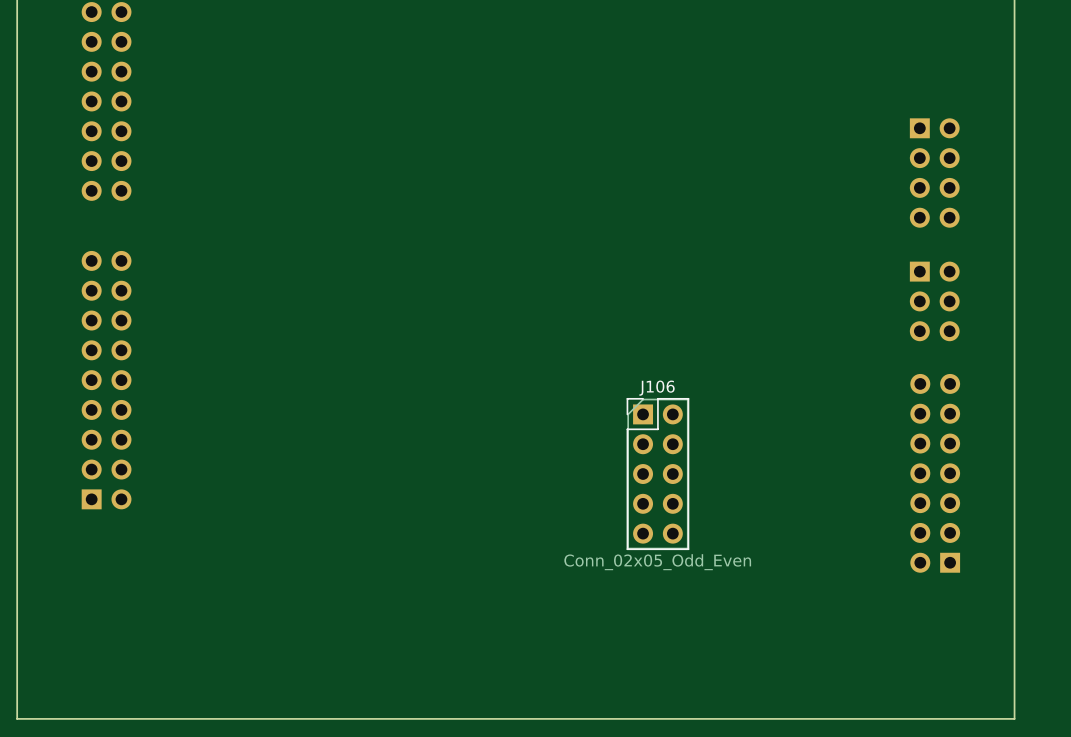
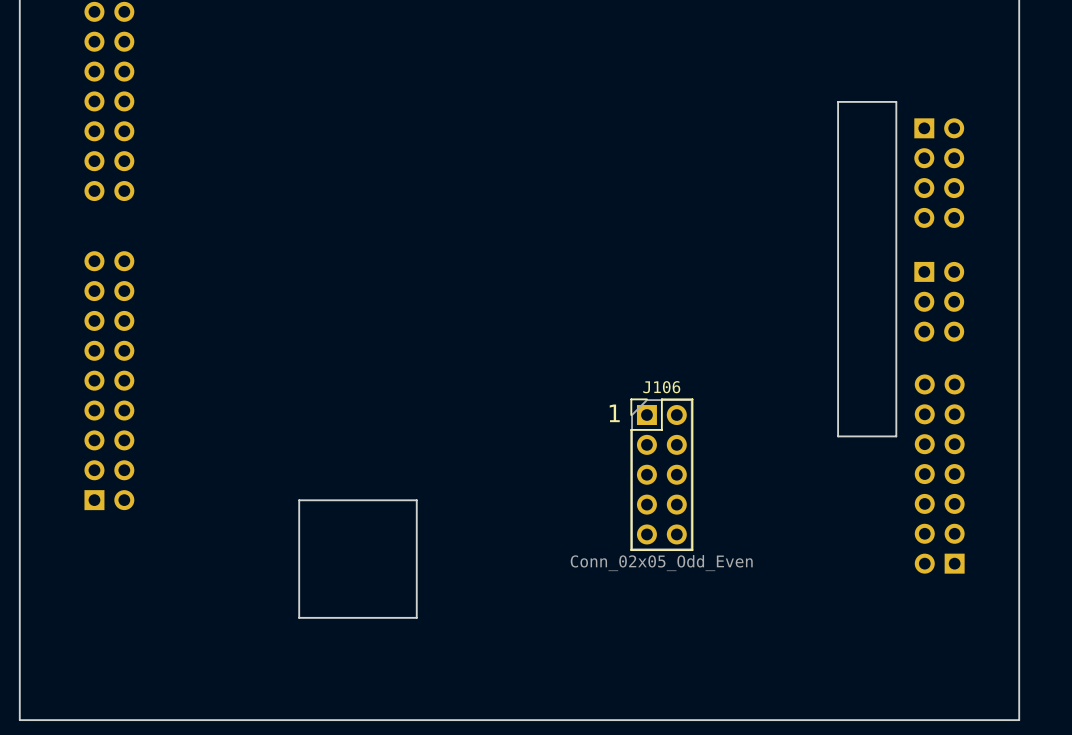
board edge: none -> (838, 101) (896, 101) (896, 436) (838, 436) (838, 101)
text: none -> 1 (614, 413)
board edge: none -> (299, 500) (299, 617) (416, 617) (416, 500) (299, 500)

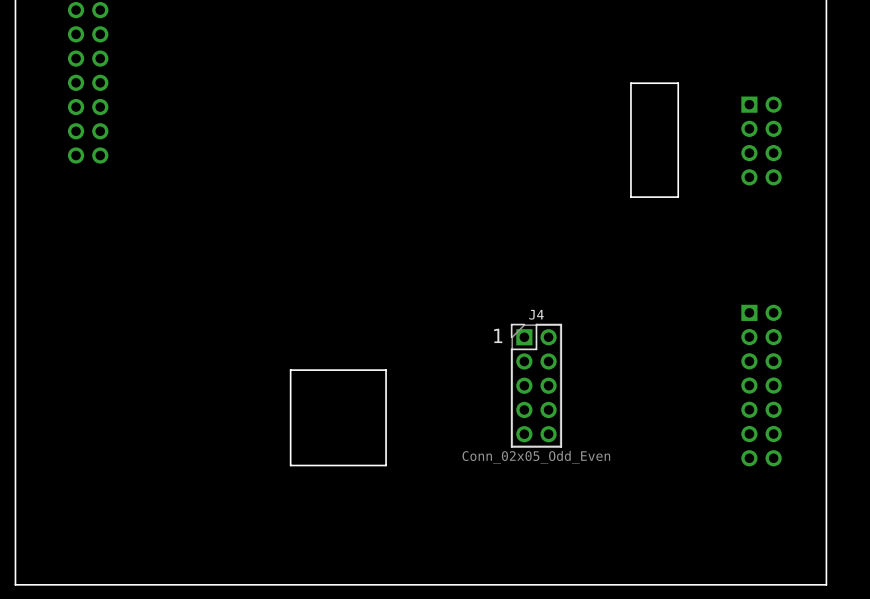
board edge: none -> (630, 83) (678, 83) (678, 197) (630, 197) (630, 83)
board edge: (838, 101) (896, 101) (896, 436) (838, 436) (838, 101) -> none
part: (939, 301) -> none
part: (109, 380) -> none
J106 name: J106 (661, 387) -> J4 (536, 314)
part rotation: 0° (939, 474) -> 180° (761, 385)
board edge: (299, 500) (299, 617) (416, 617) (416, 500) (299, 500) -> (290, 370) (290, 465) (386, 465) (386, 370) (290, 370)

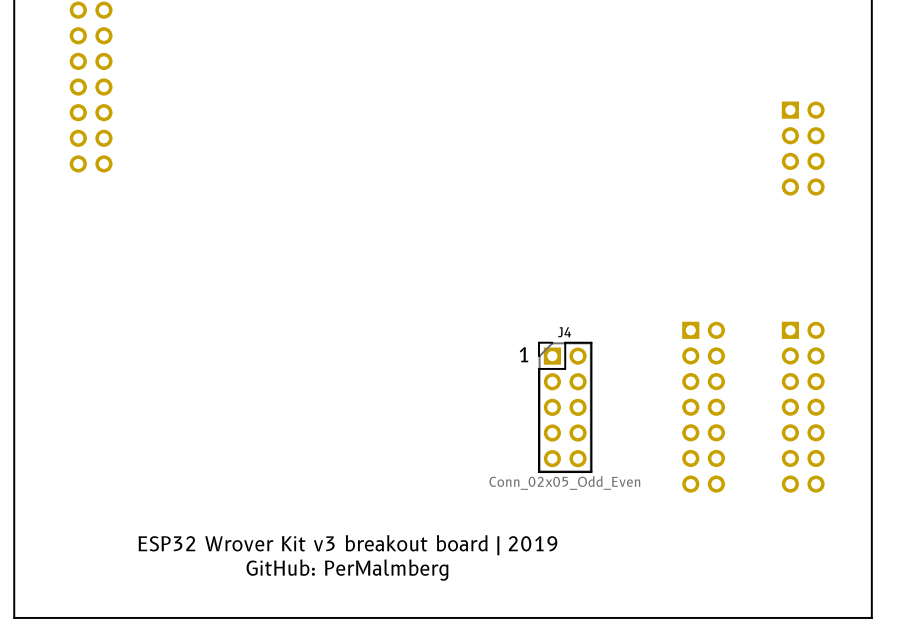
board edge: (630, 83) (678, 83) (678, 197) (630, 197) (630, 83) -> none
board edge: (290, 370) (290, 465) (386, 465) (386, 370) (290, 370) -> none
part: none -> (703, 407)
text: none -> ESP32 Wrover Kit v3 breakout board | 2019 (347, 545)
text: none -> GitHub: PerMalmberg (347, 570)

